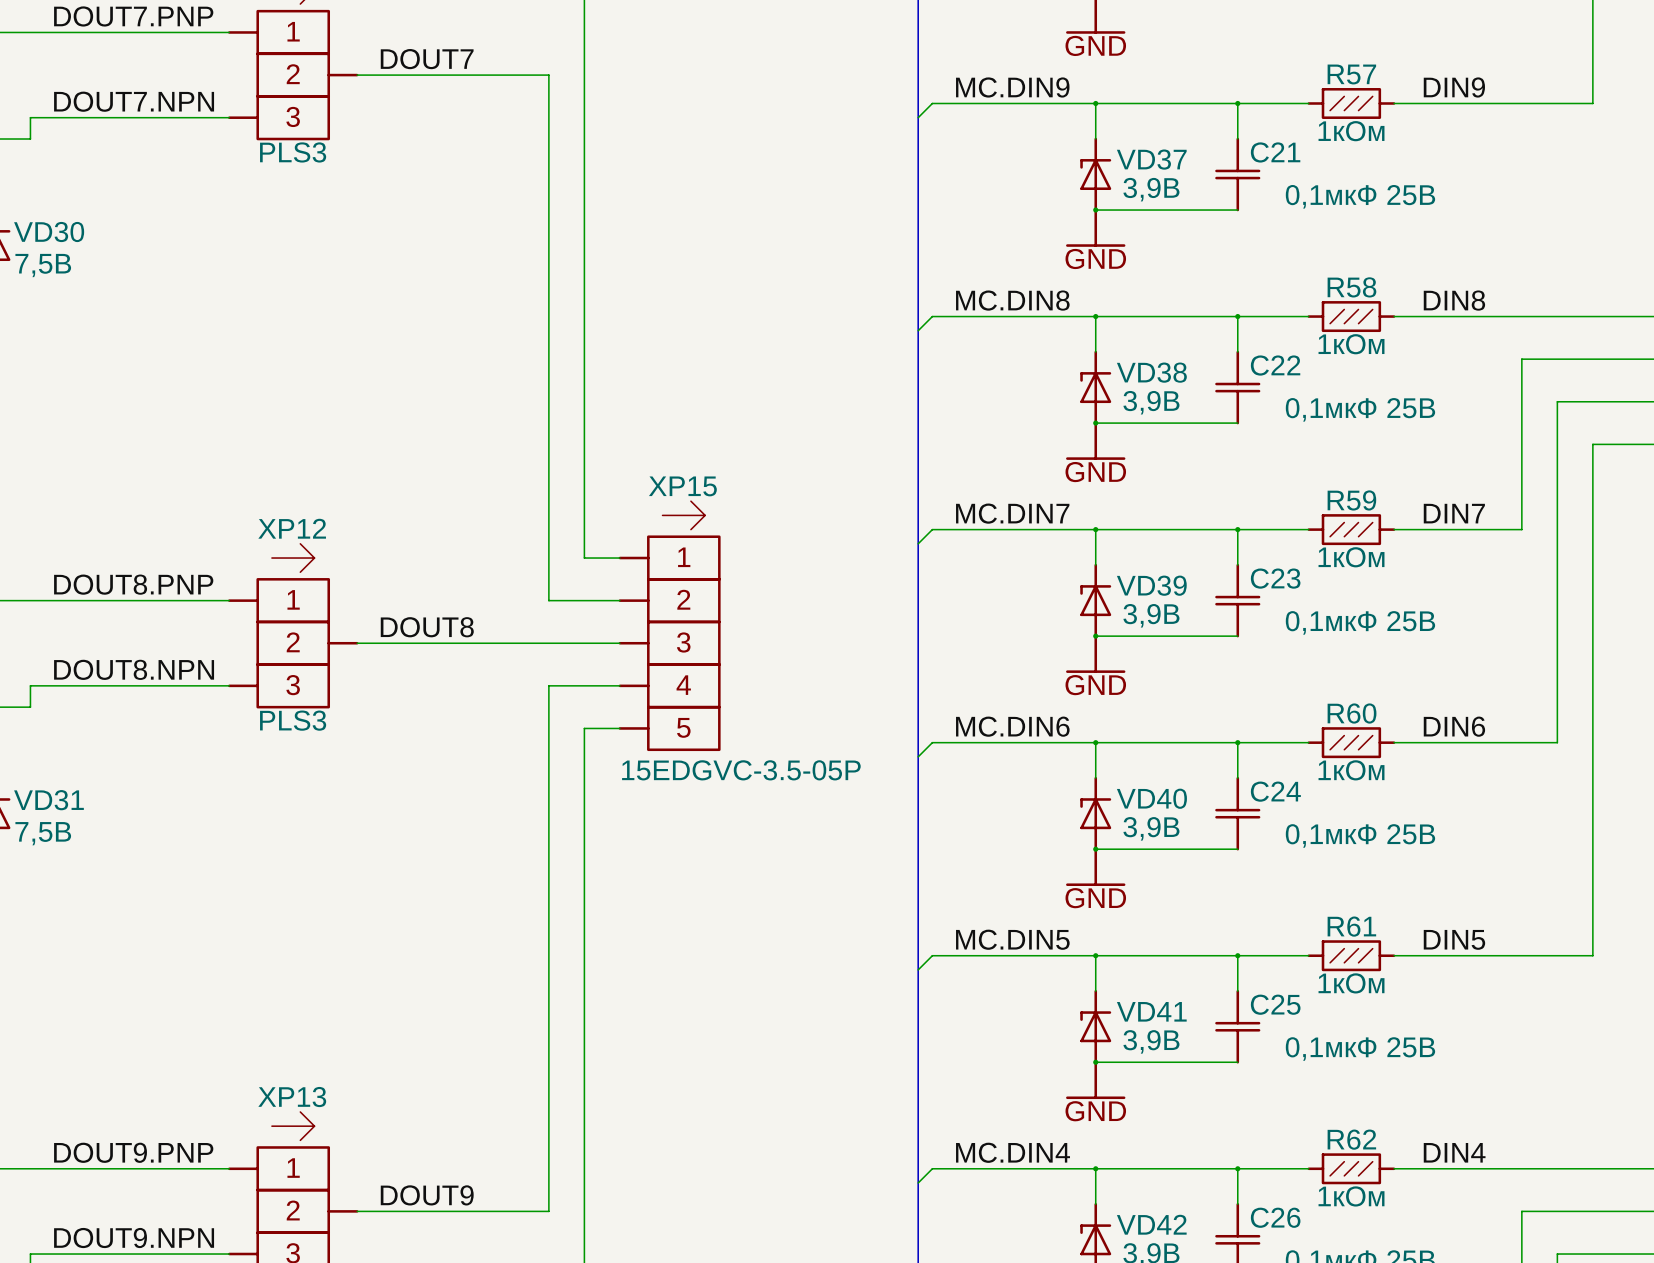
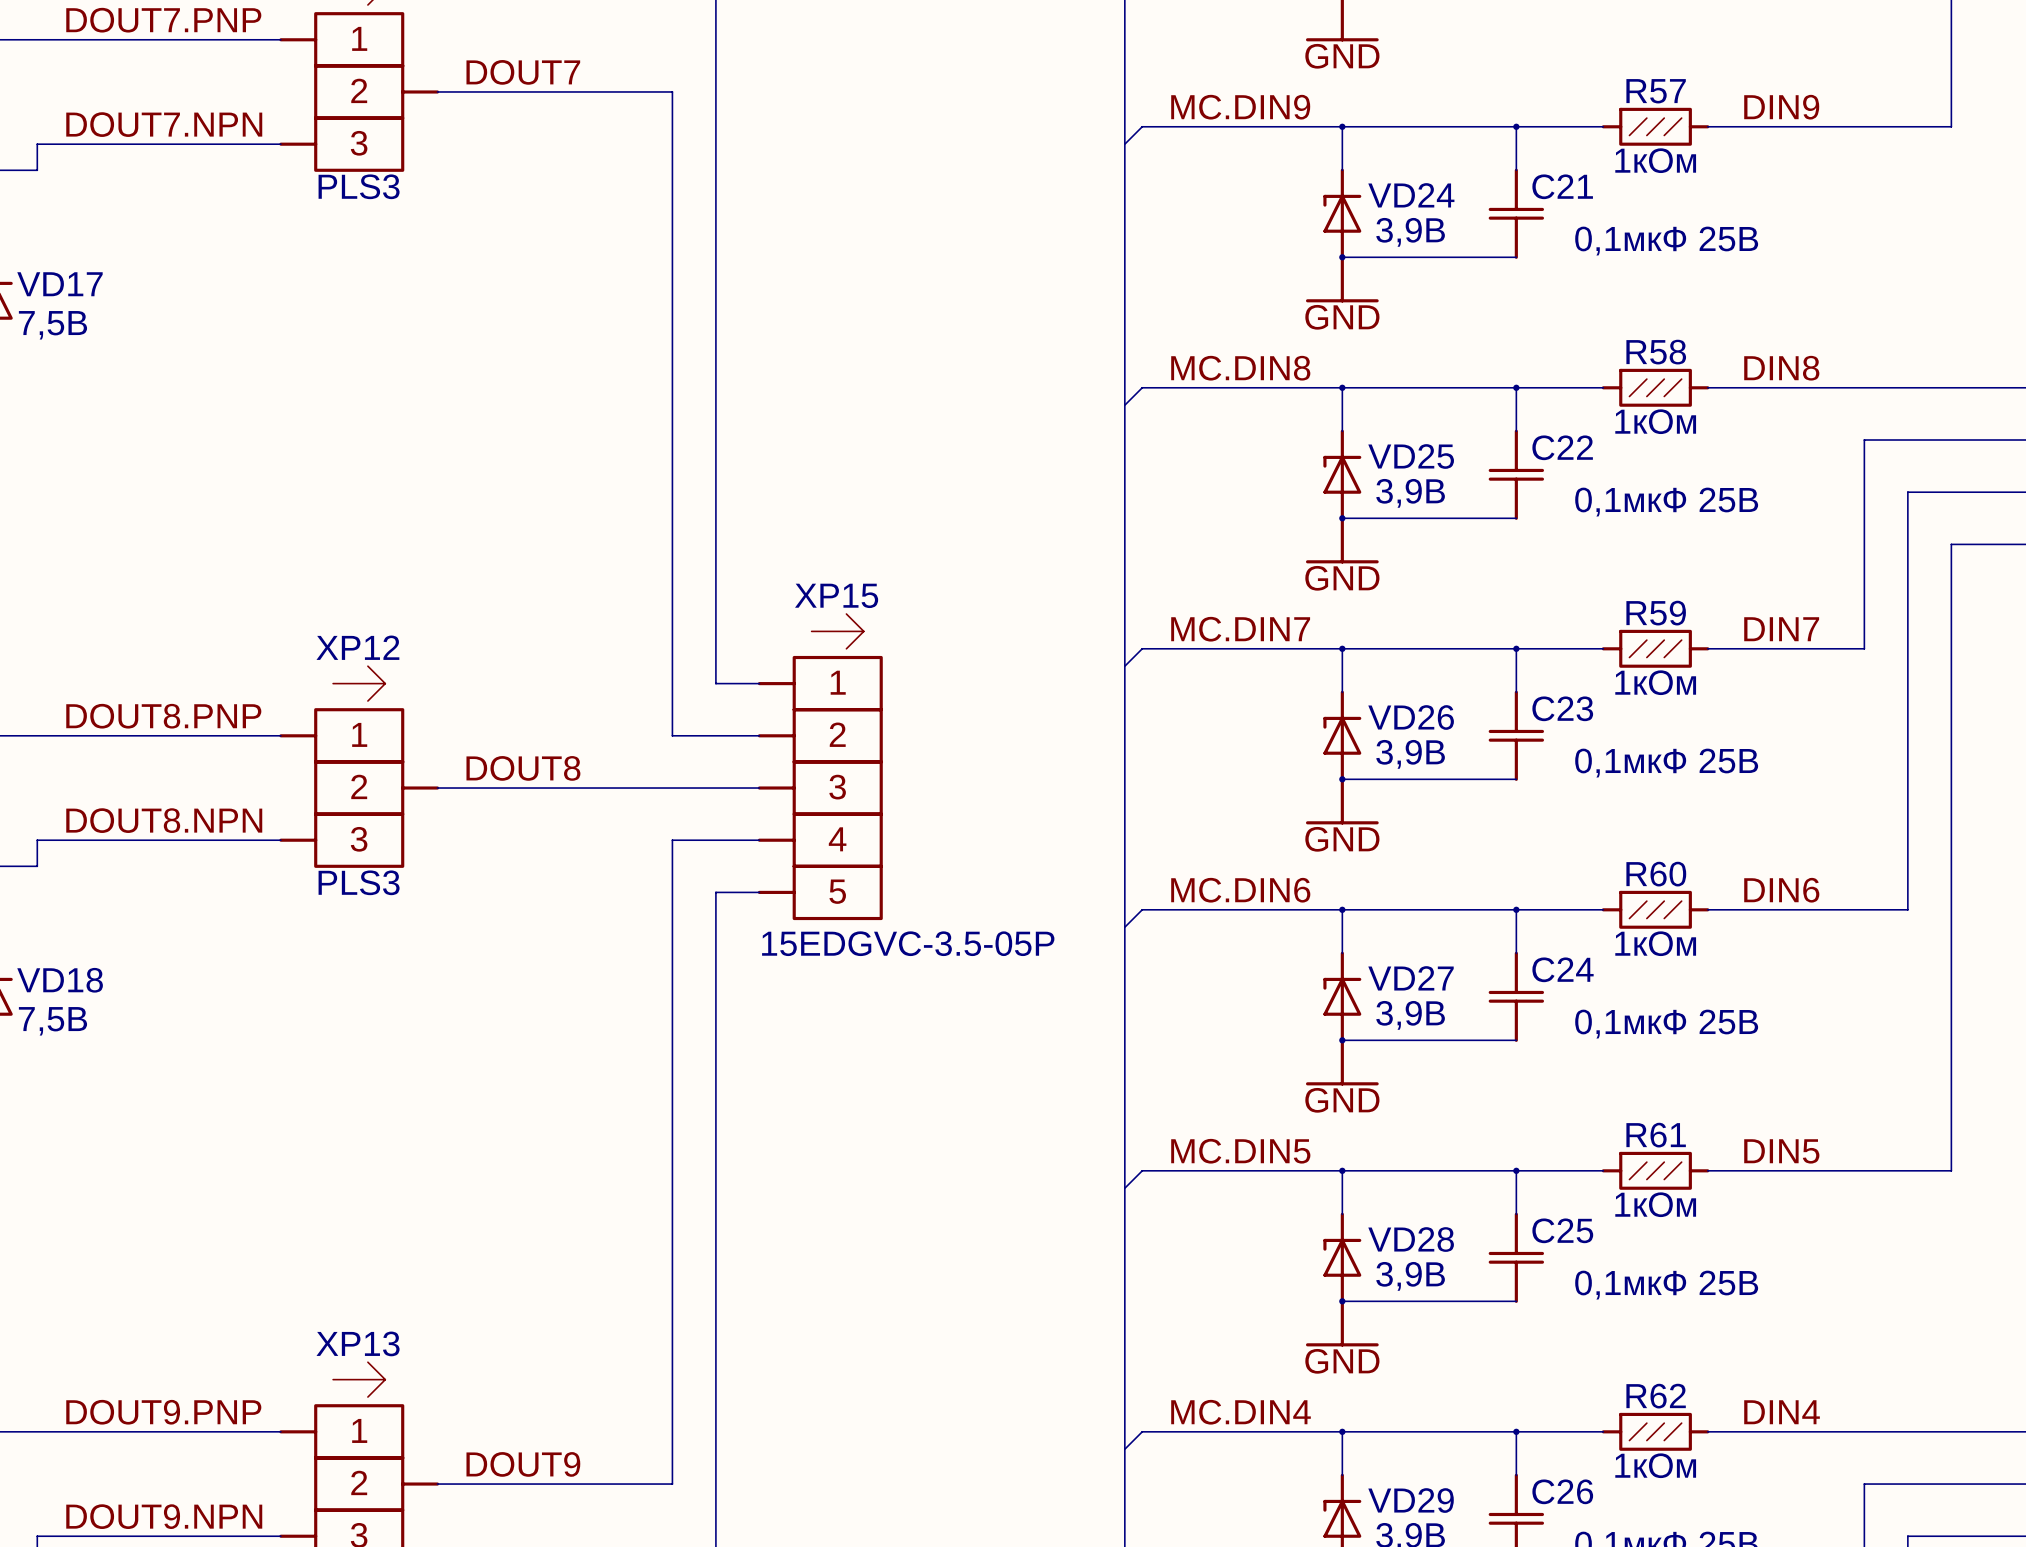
VD37 name: VD37 (1151, 159) -> VD24 (1411, 195)
VD30 name: VD30 (49, 232) -> VD17 (59, 284)
VD38 name: VD38 (1151, 372) -> VD25 (1411, 456)
VD39 name: VD39 (1151, 585) -> VD26 (1411, 717)
VD40 name: VD40 (1151, 798) -> VD27 (1410, 978)
VD31 name: VD31 (48, 800) -> VD18 (60, 980)
VD41 name: VD41 (1151, 1011) -> VD28 (1411, 1239)
VD42 name: VD42 (1151, 1224) -> VD29 (1411, 1500)

